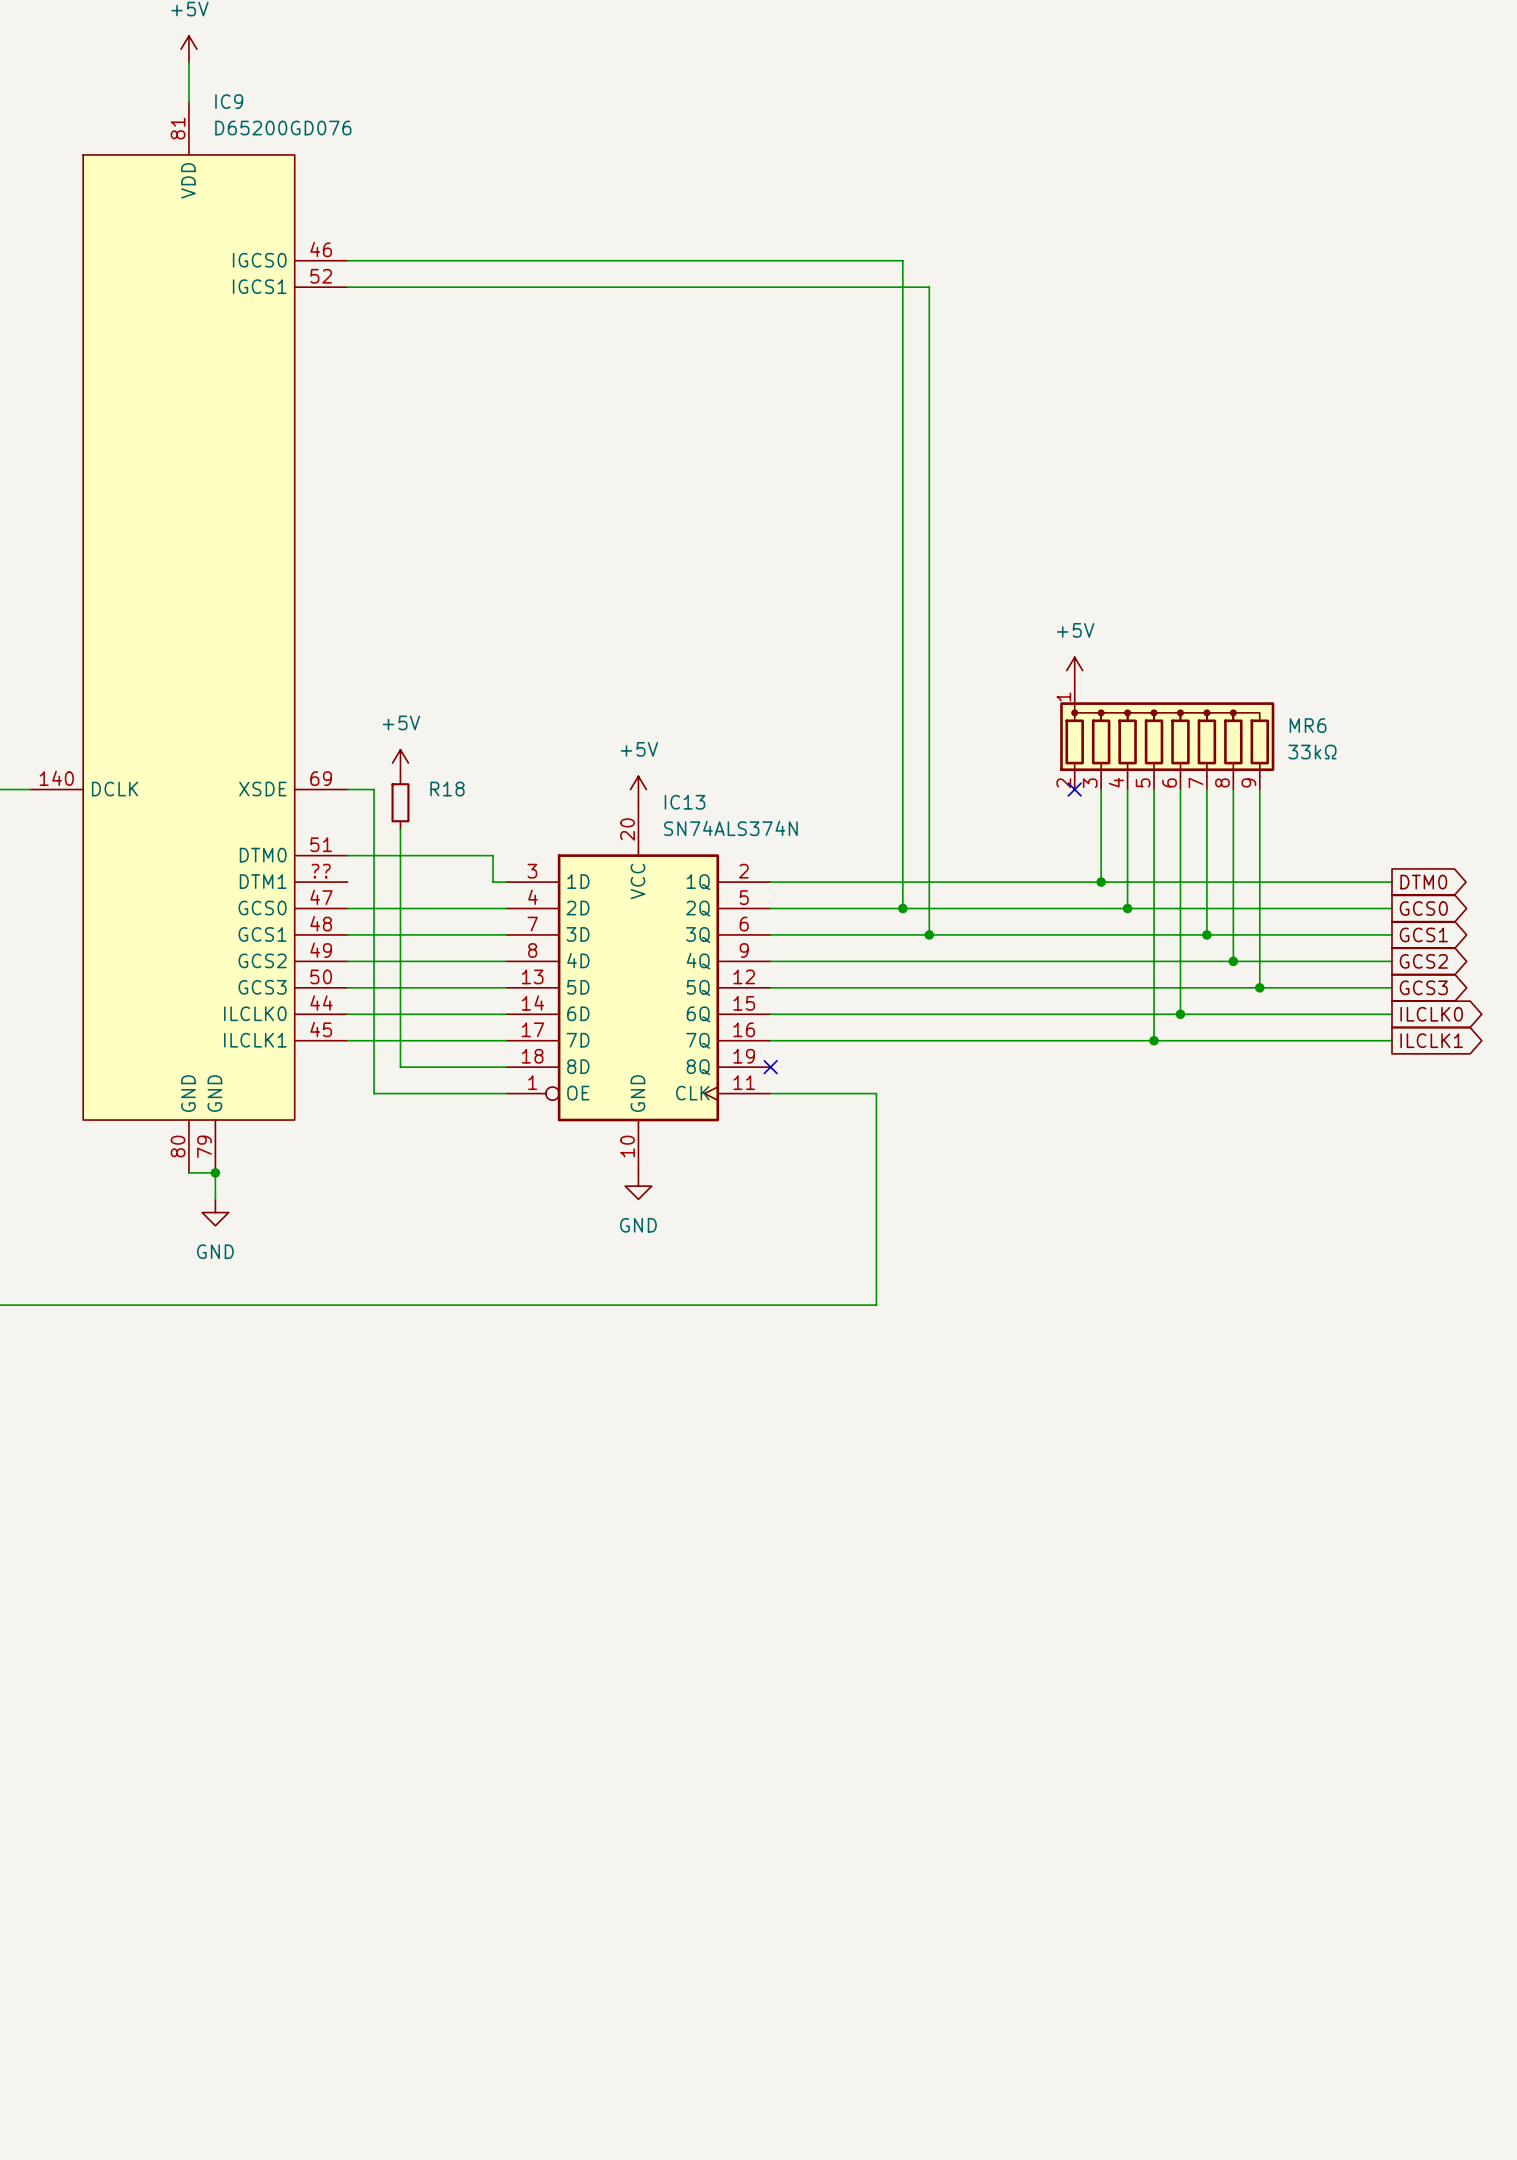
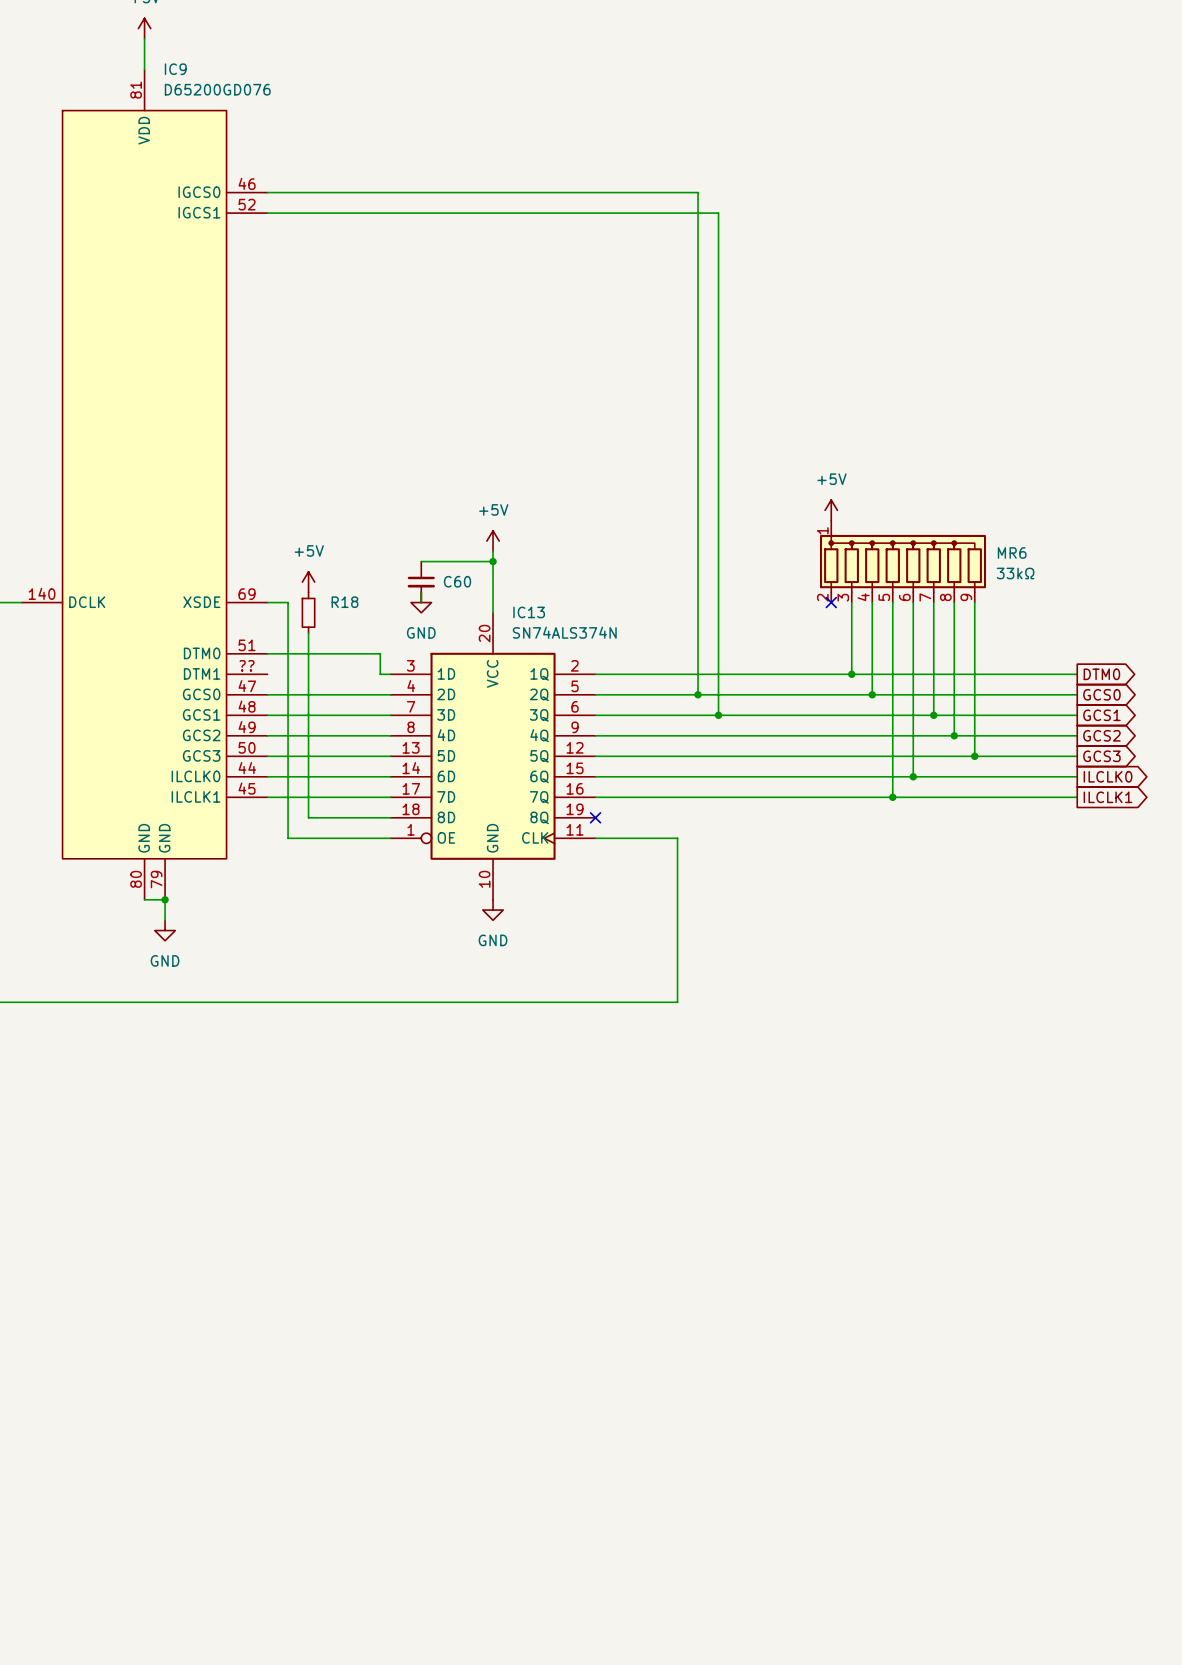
wire: none -> (493, 551) (493, 612)
wire: none -> (421, 561) (493, 561)
junction: none -> (493, 561)
C60: none -> (421, 582)
wire: none -> (421, 592) (421, 602)
power symbol: none -> GND (421, 602)
power symbol position: +5V (638, 789) -> +5V (493, 541)

